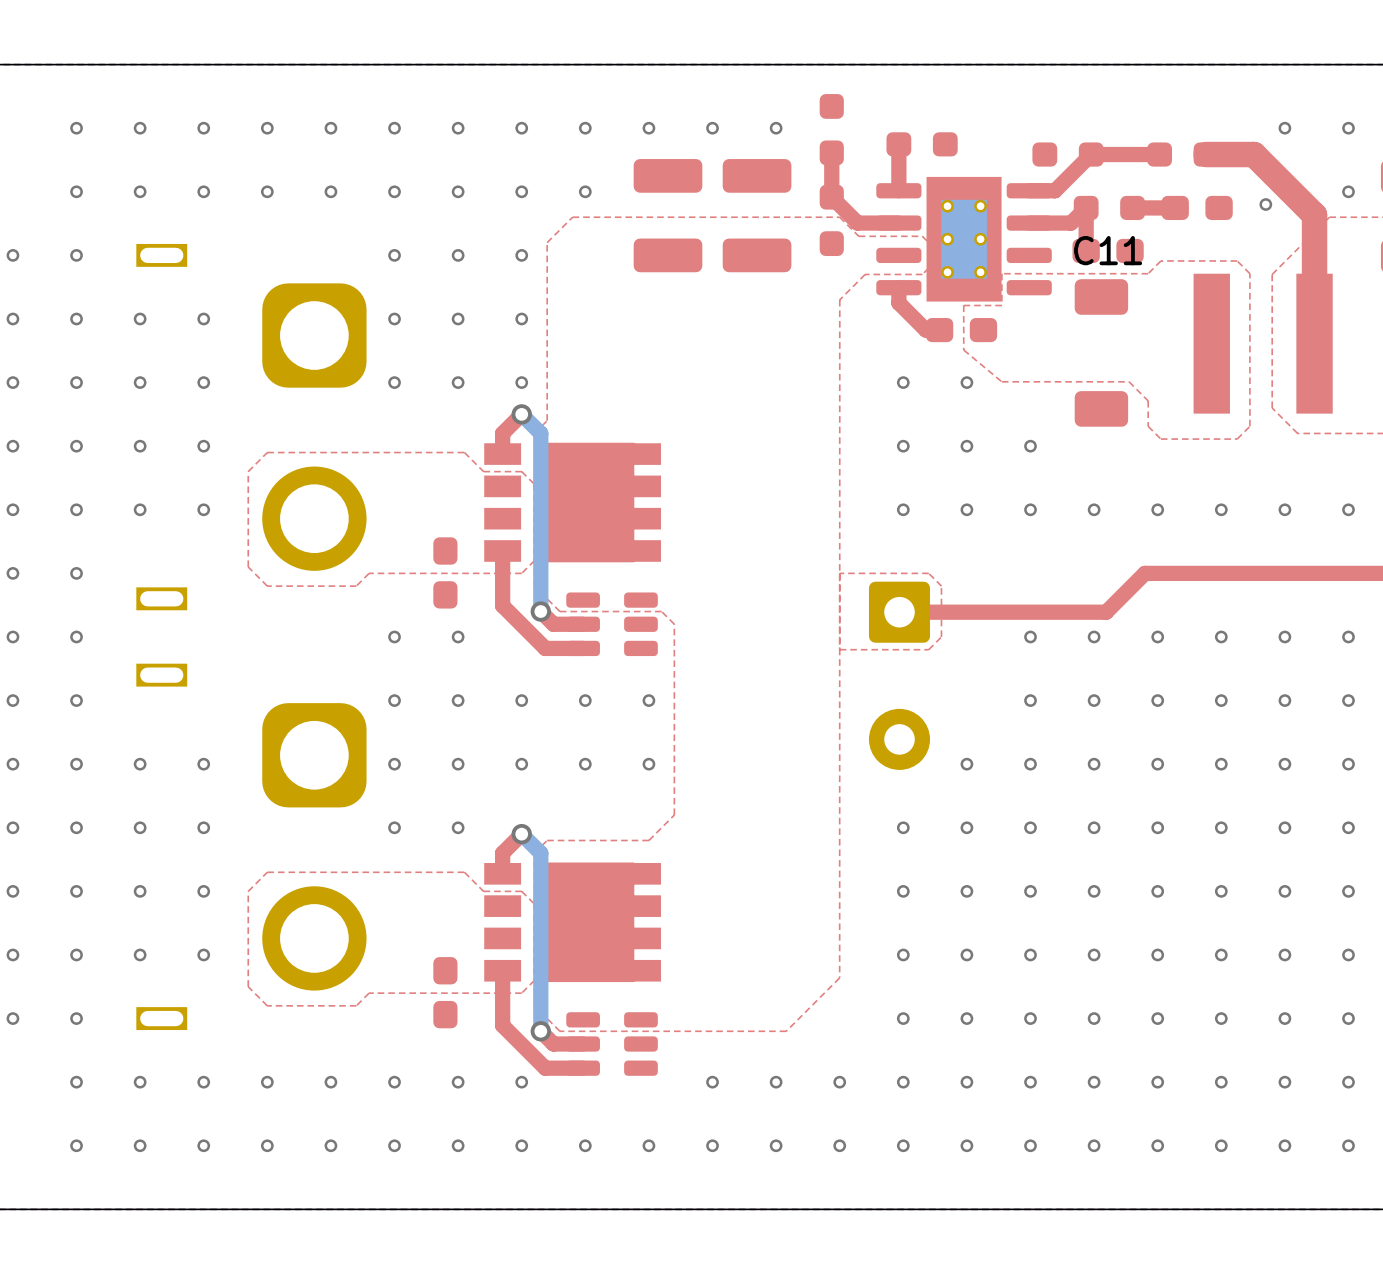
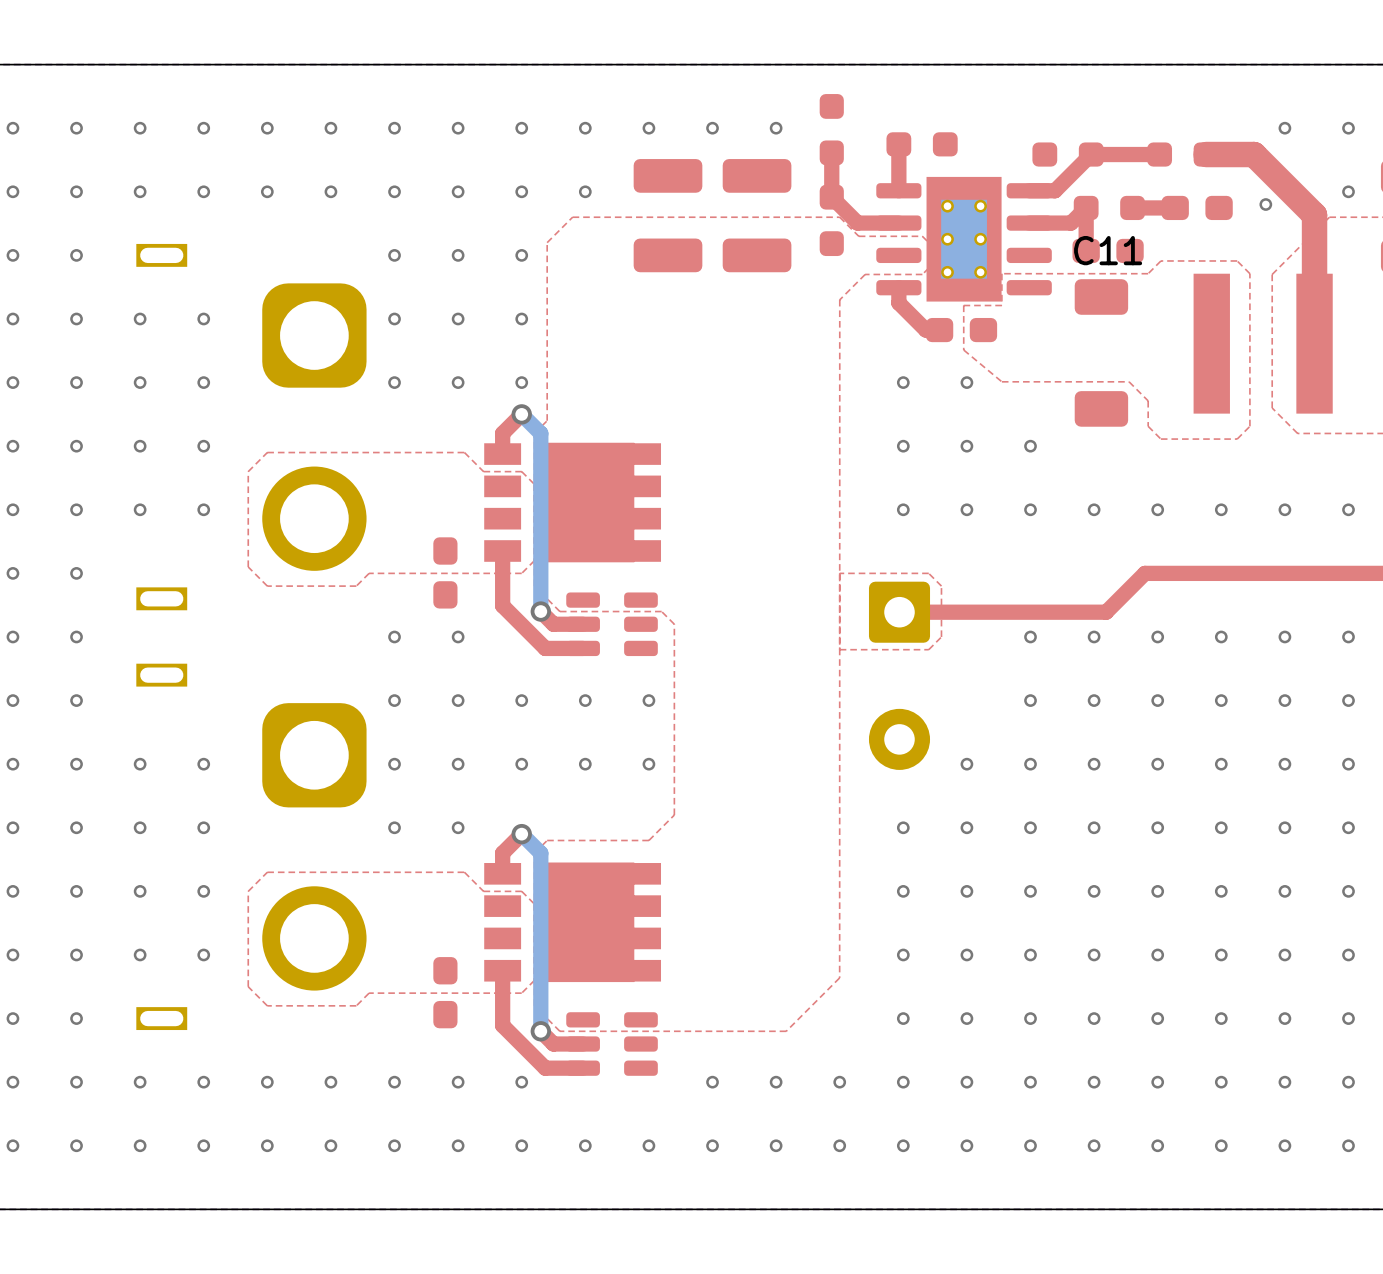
via: none -> (12, 128)
via: none -> (12, 191)
via: none -> (12, 1082)
via: none -> (12, 1145)

